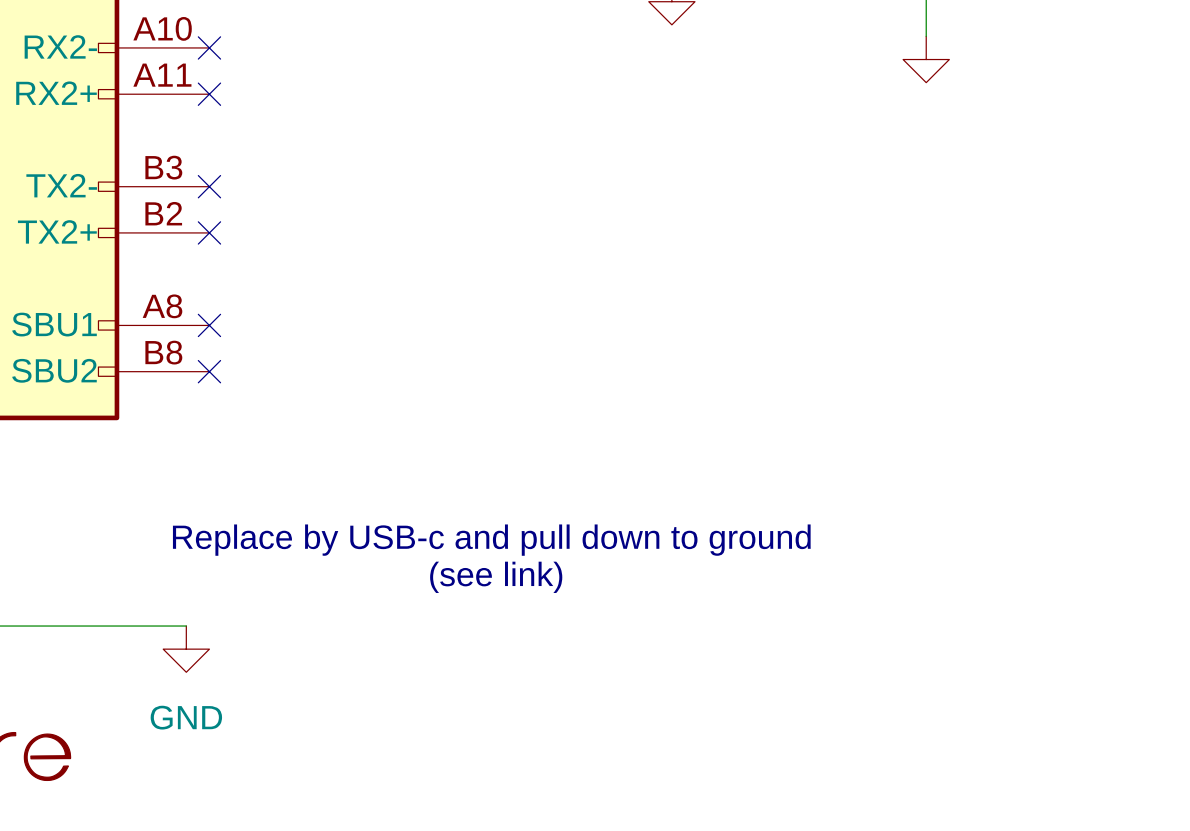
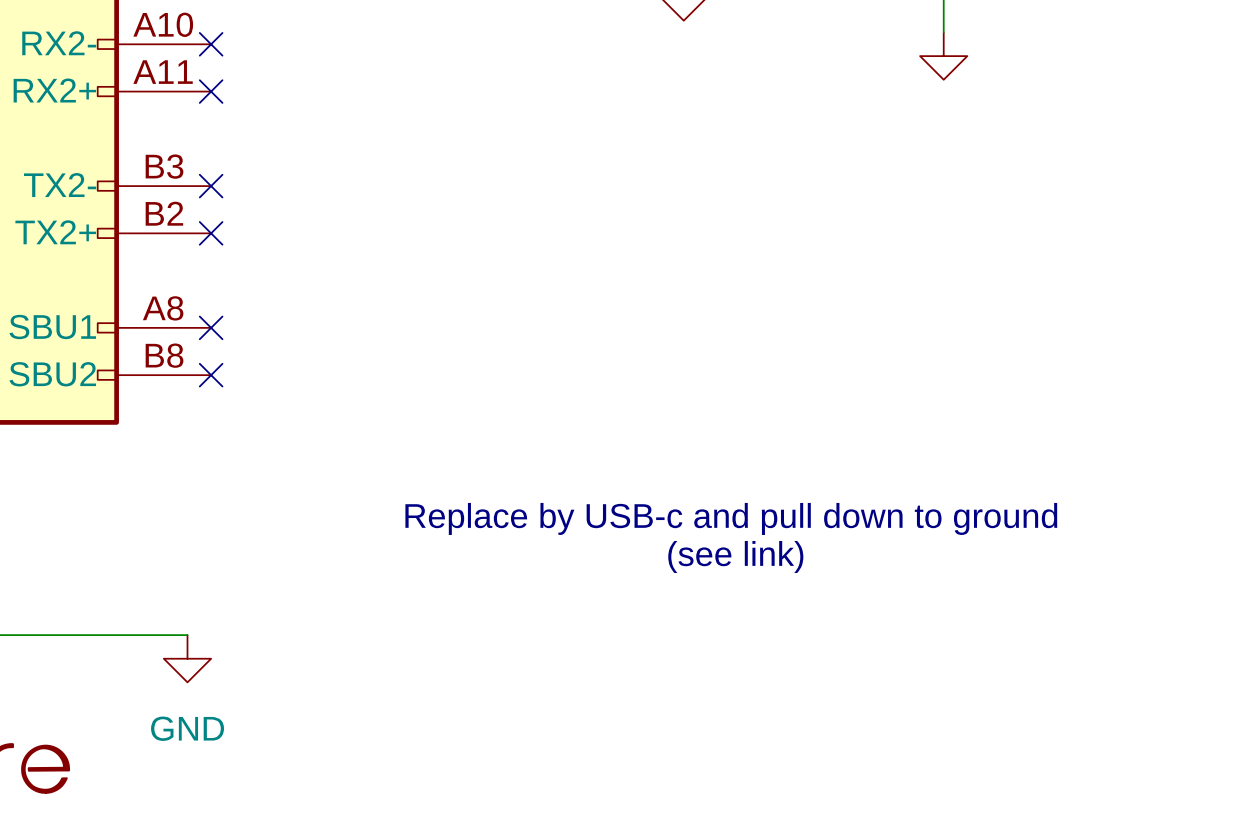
text position: Replace by USB-c and pull down to ground (491, 540) -> Replace by USB-c and pull down to ground (731, 518)
text position: (see link) (496, 577) -> (see link) (735, 556)

